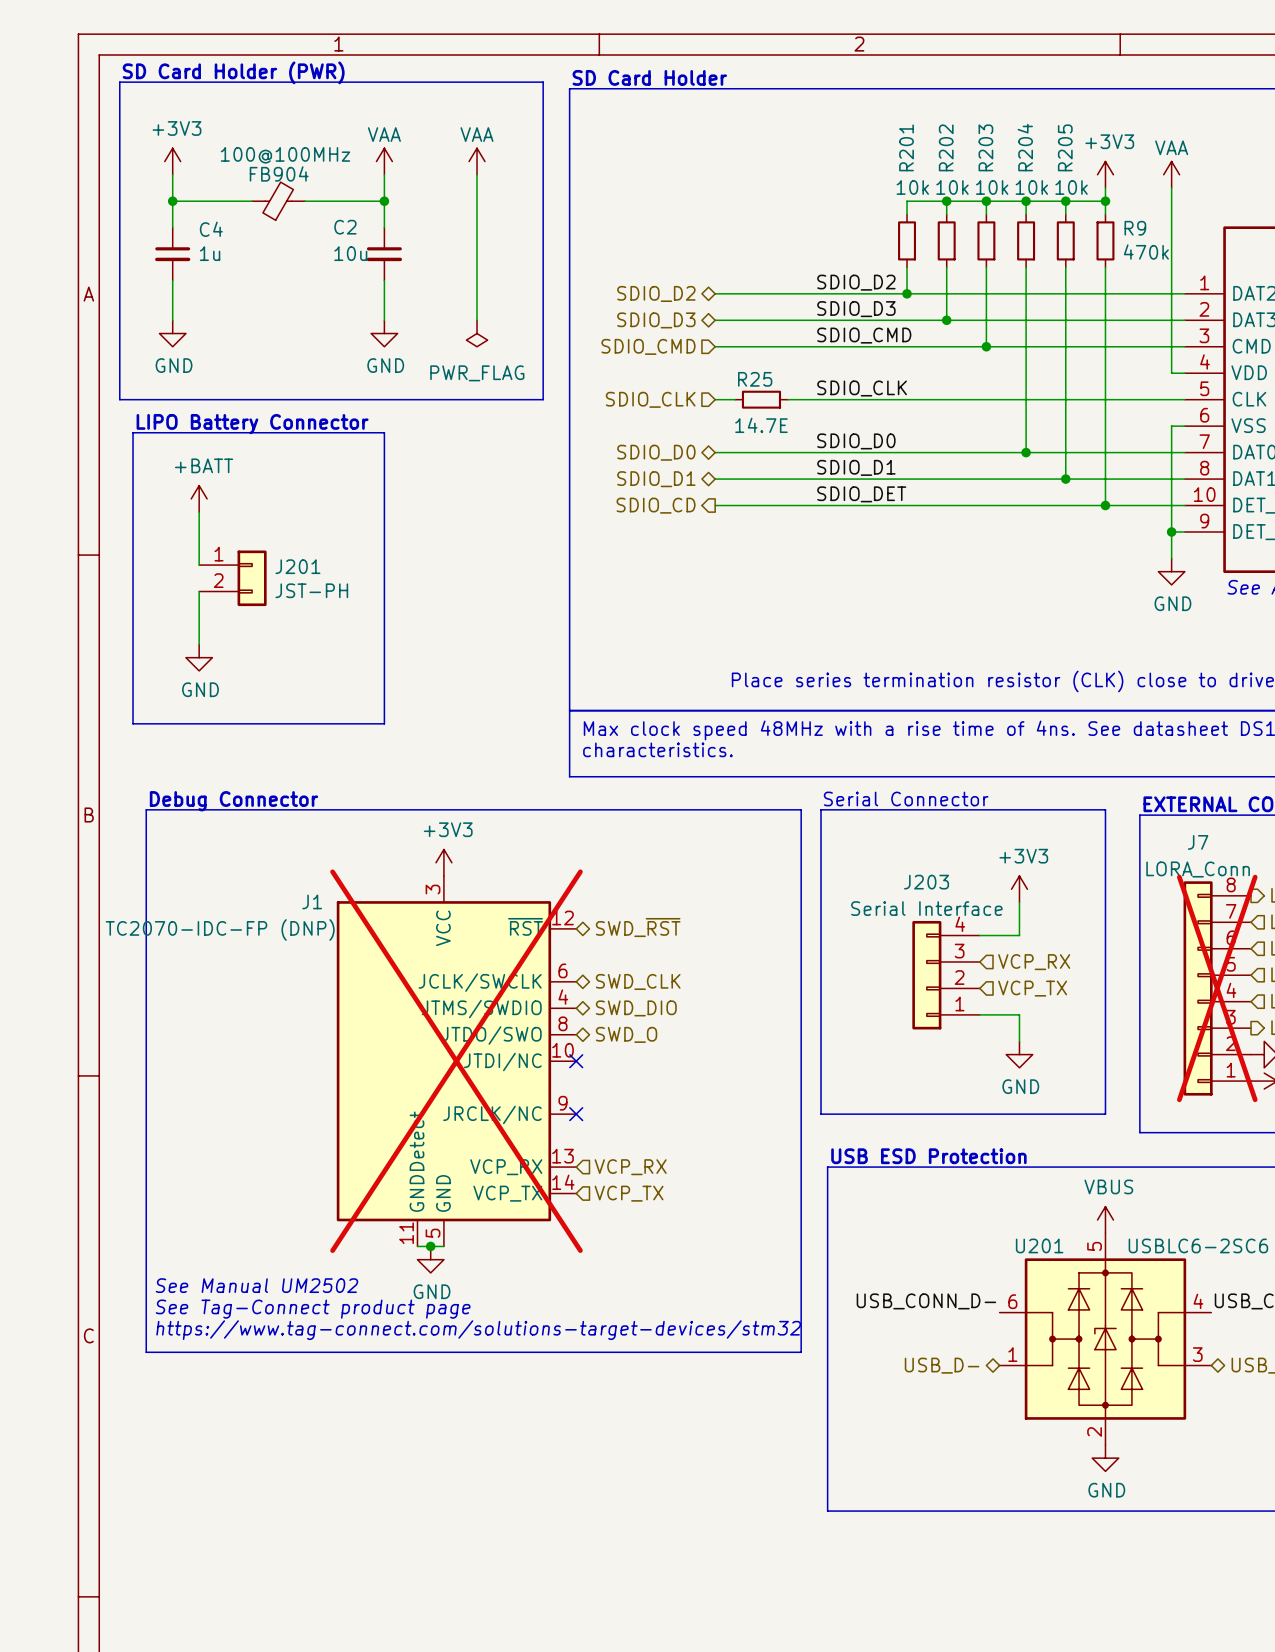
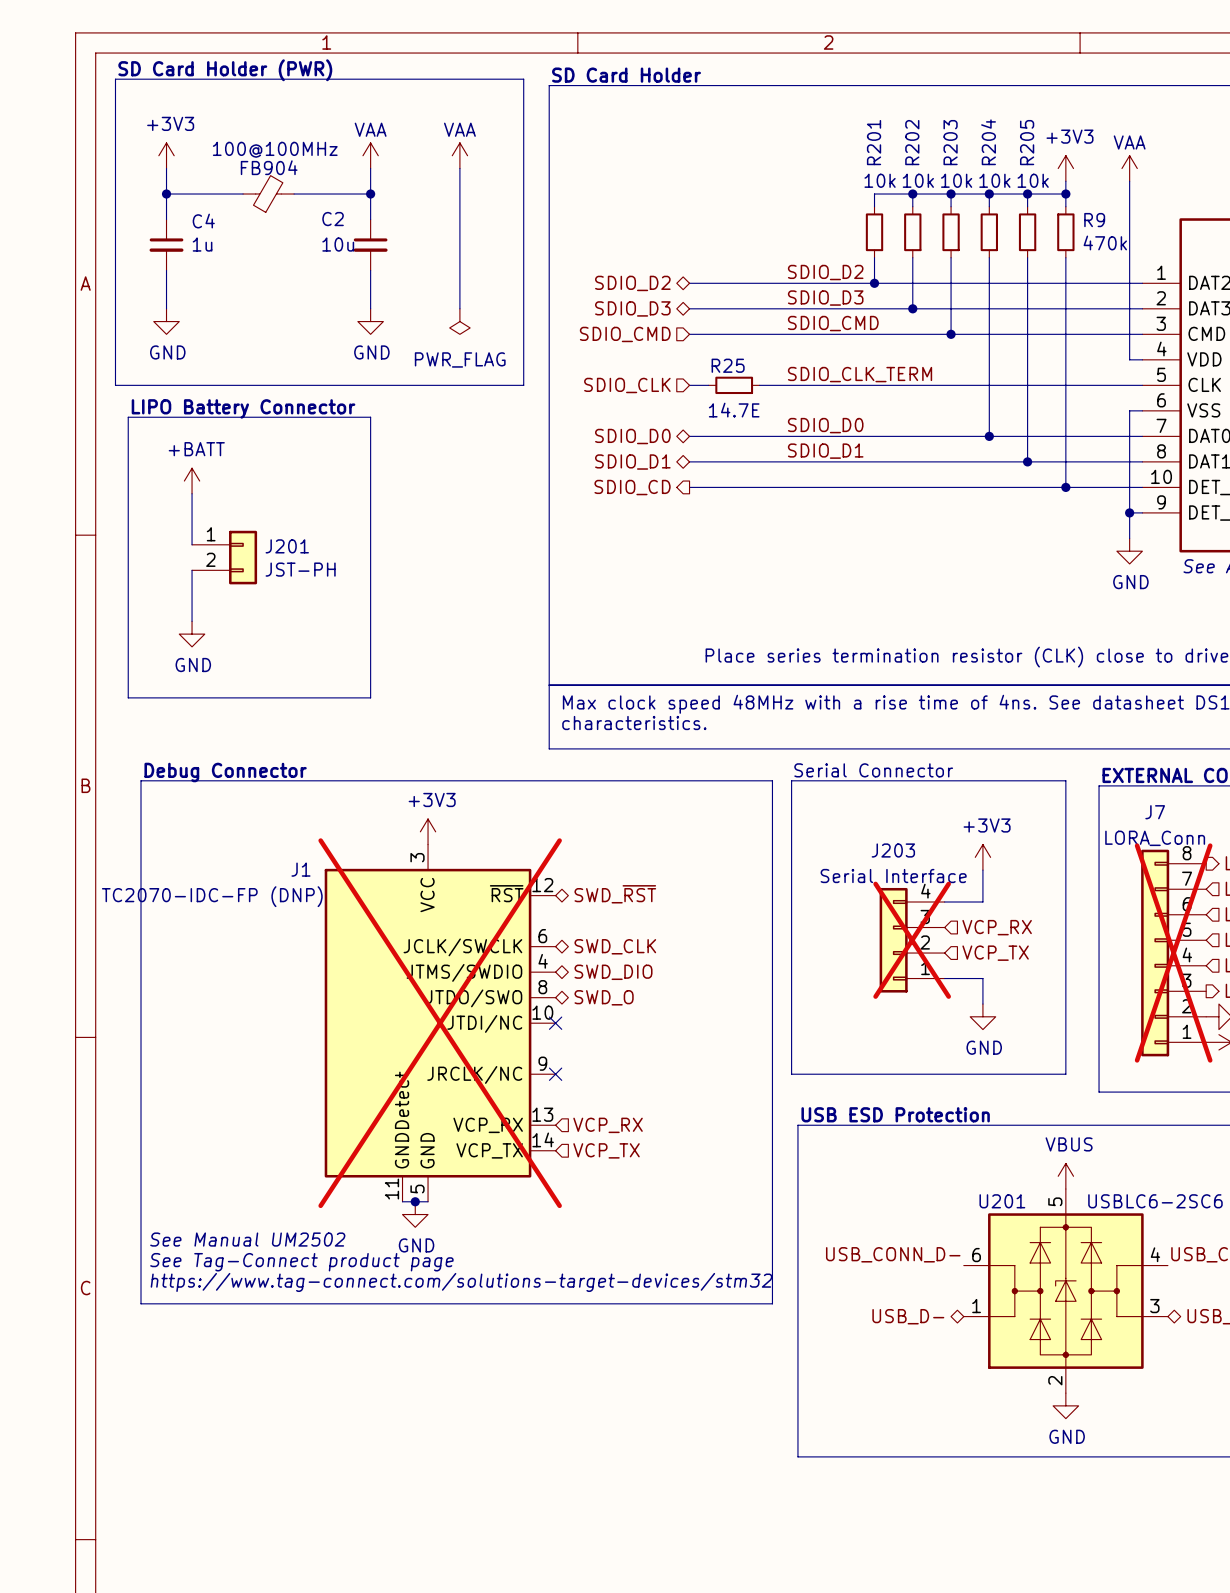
label: SDIO_CLK (862, 388) -> SDIO_CLK_TERM (860, 374)
label: SDIO_DET (861, 494) -> none
J203 do-not-place cross: none -> (912, 940)

